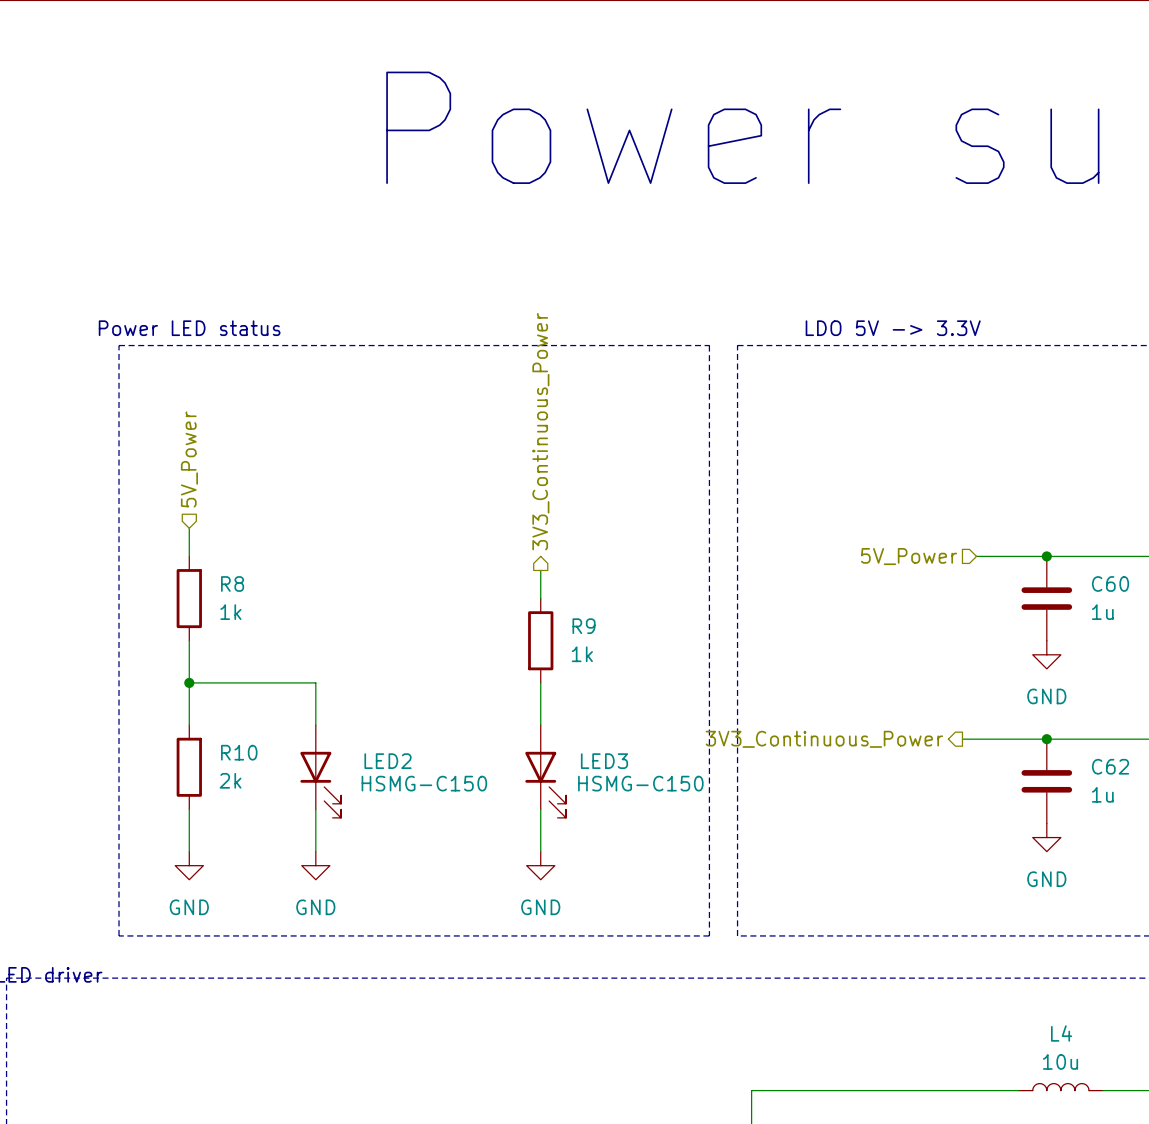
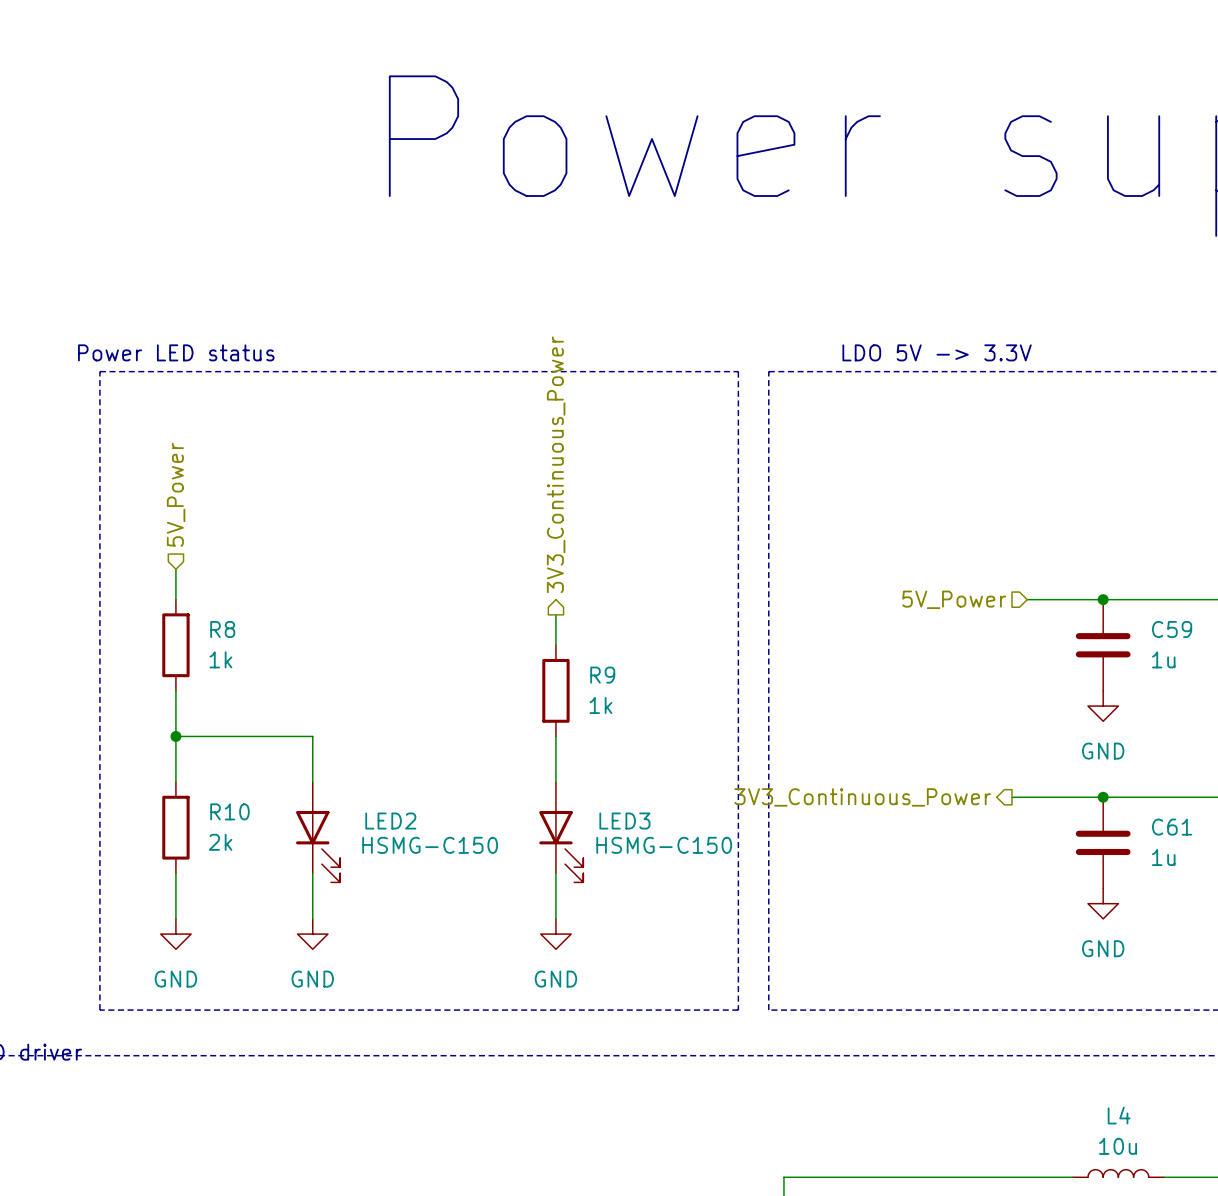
C60 name: C60 (1110, 584) -> C59 (1172, 629)
C62 name: C62 (1110, 766) -> C61 (1172, 827)

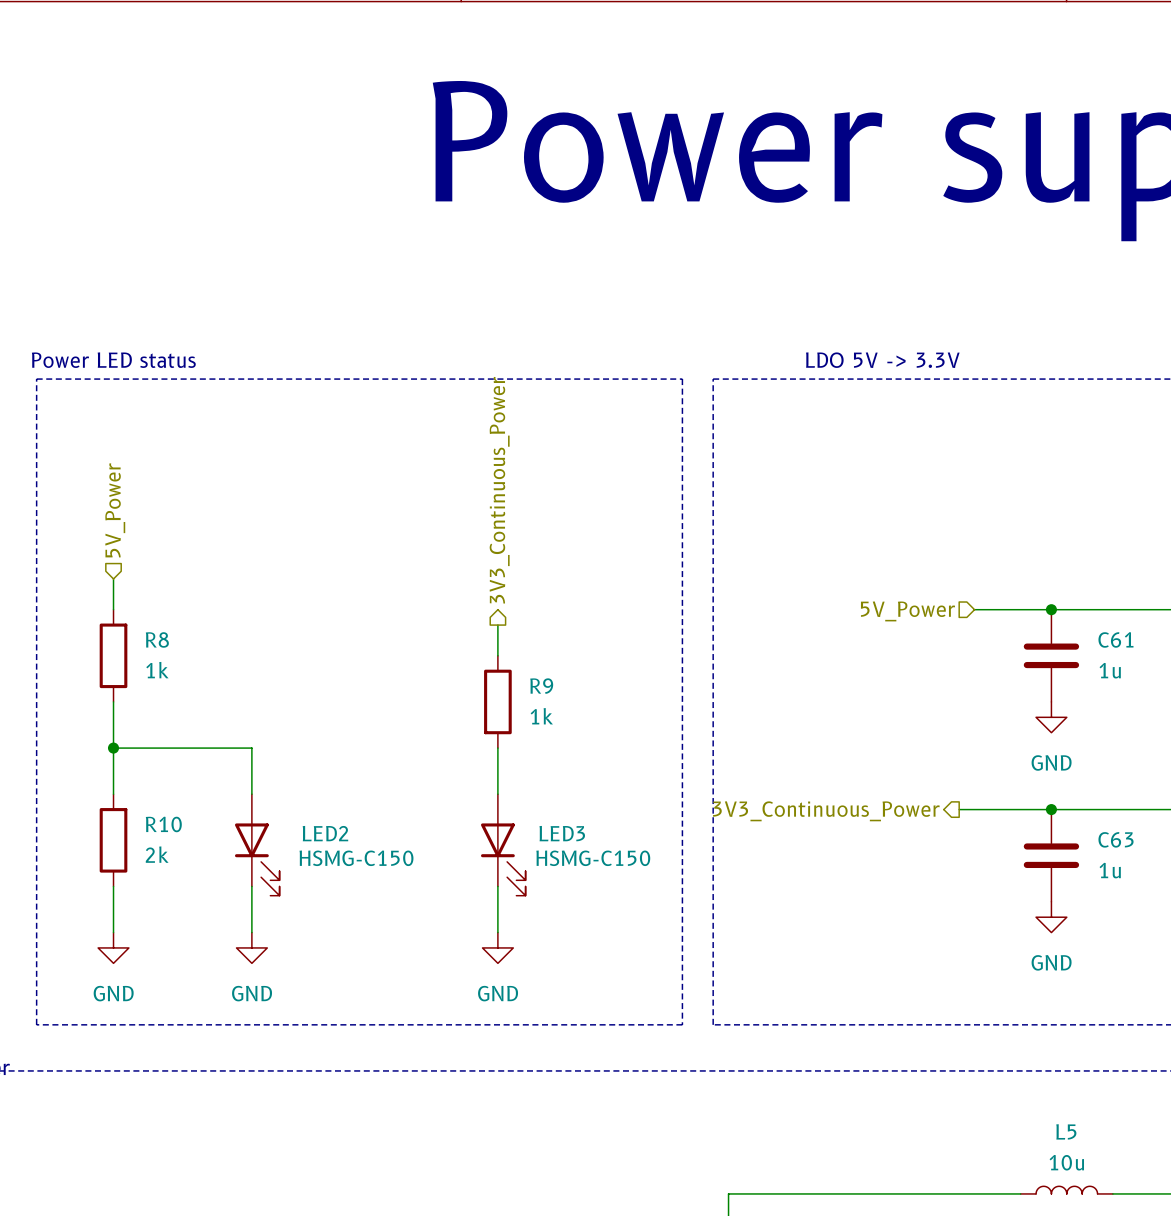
C59 name: C59 (1172, 629) -> C61 (1115, 639)
C61 name: C61 (1172, 827) -> C63 (1116, 839)
L4 name: L4 (1119, 1115) -> L5 (1066, 1131)

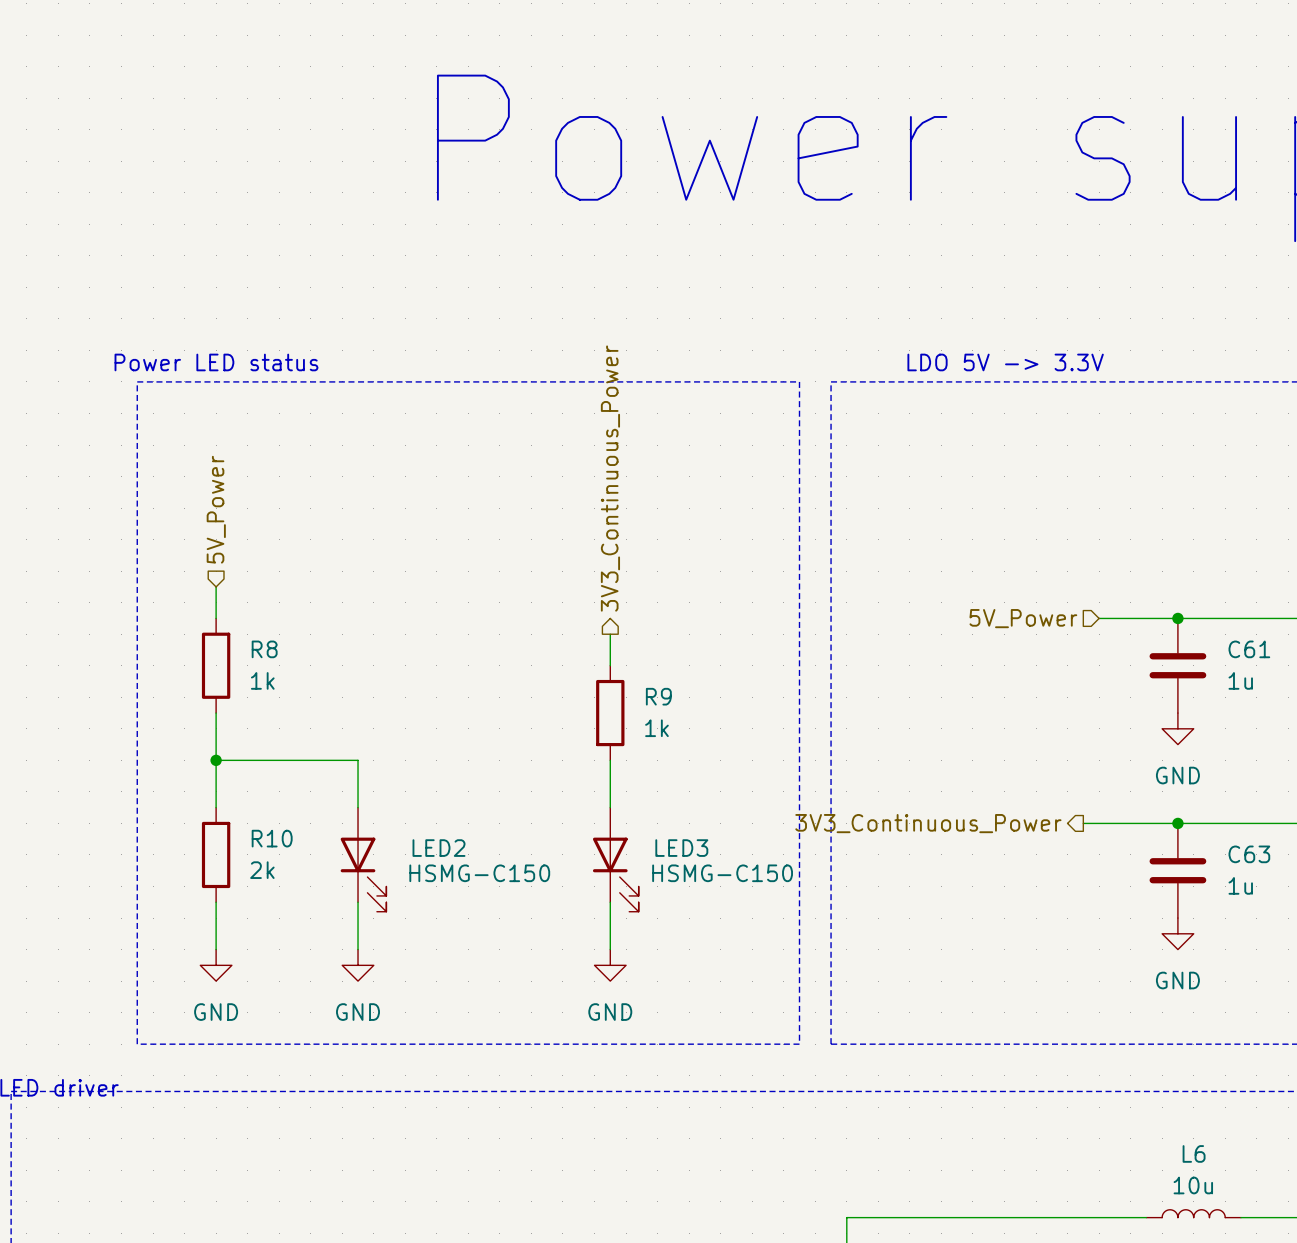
L5 name: L5 (1066, 1131) -> L6 (1194, 1153)

